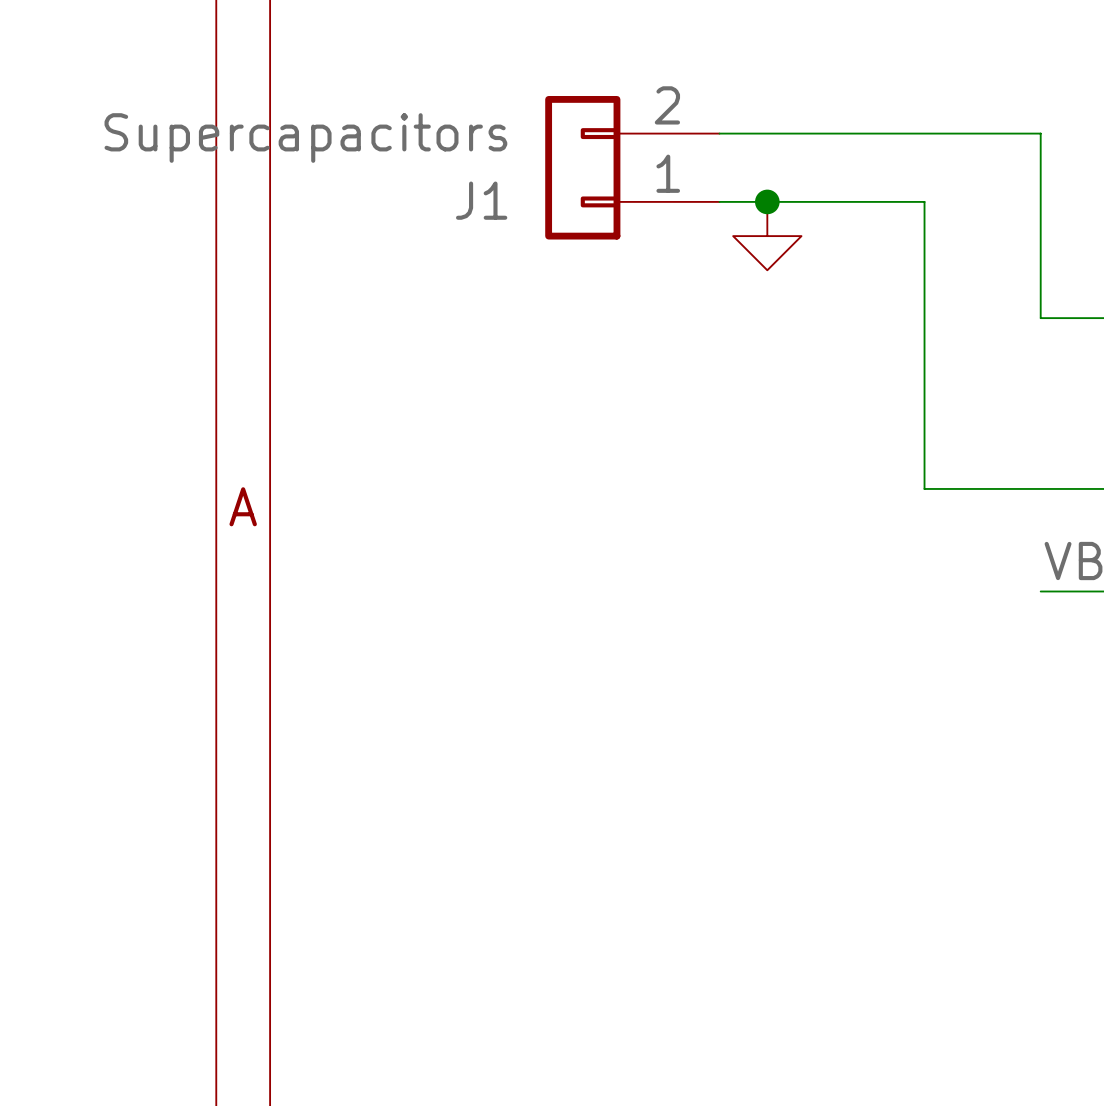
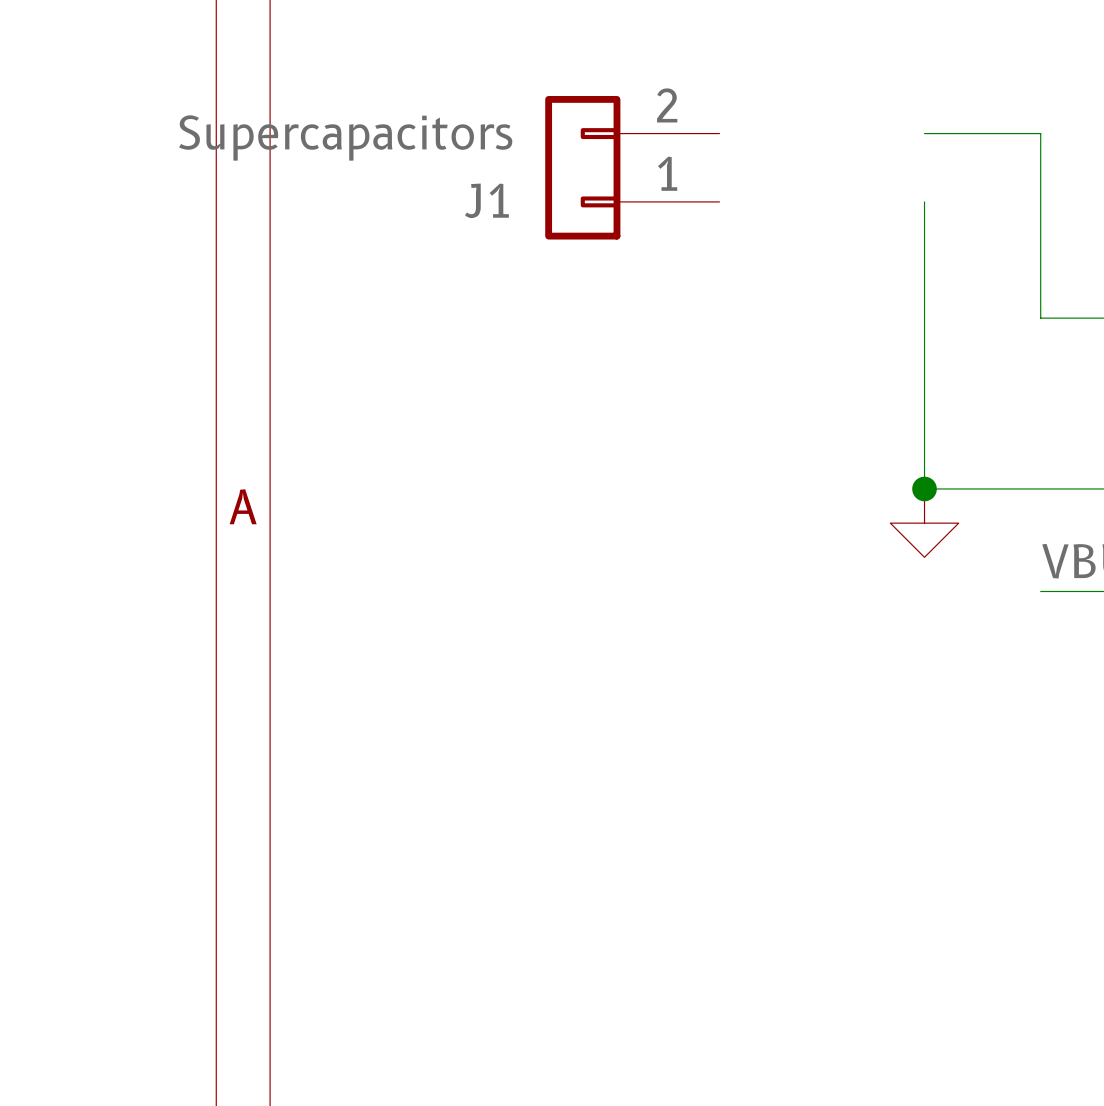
wire: (719, 133) (924, 133) -> none
wire: (719, 201) (924, 201) -> none
junction: (767, 201) -> none
power symbol position: (767, 236) -> (924, 523)
junction: none -> (924, 488)

